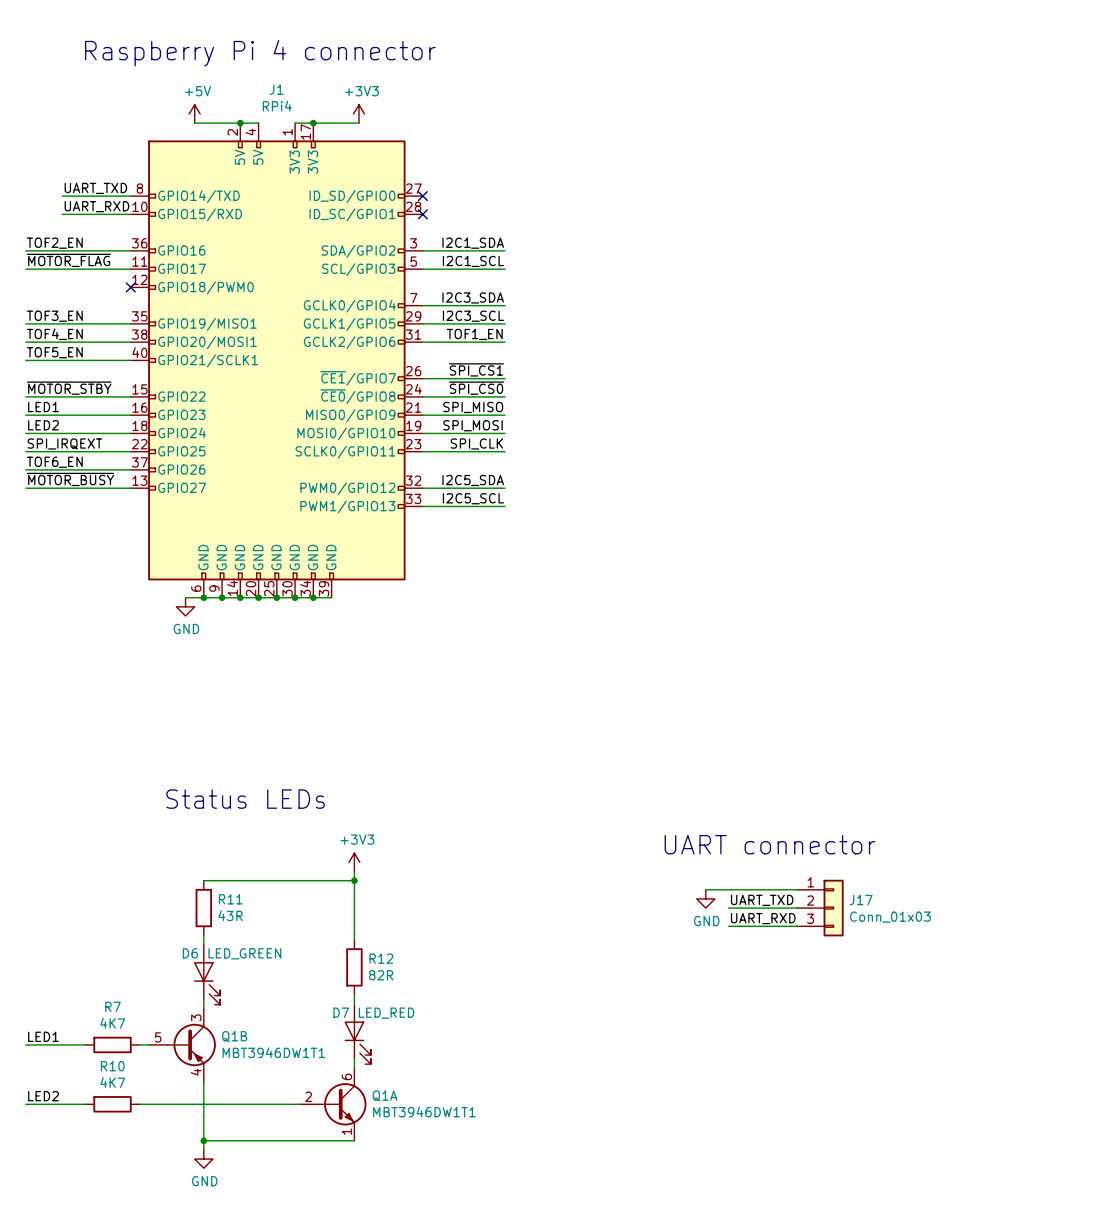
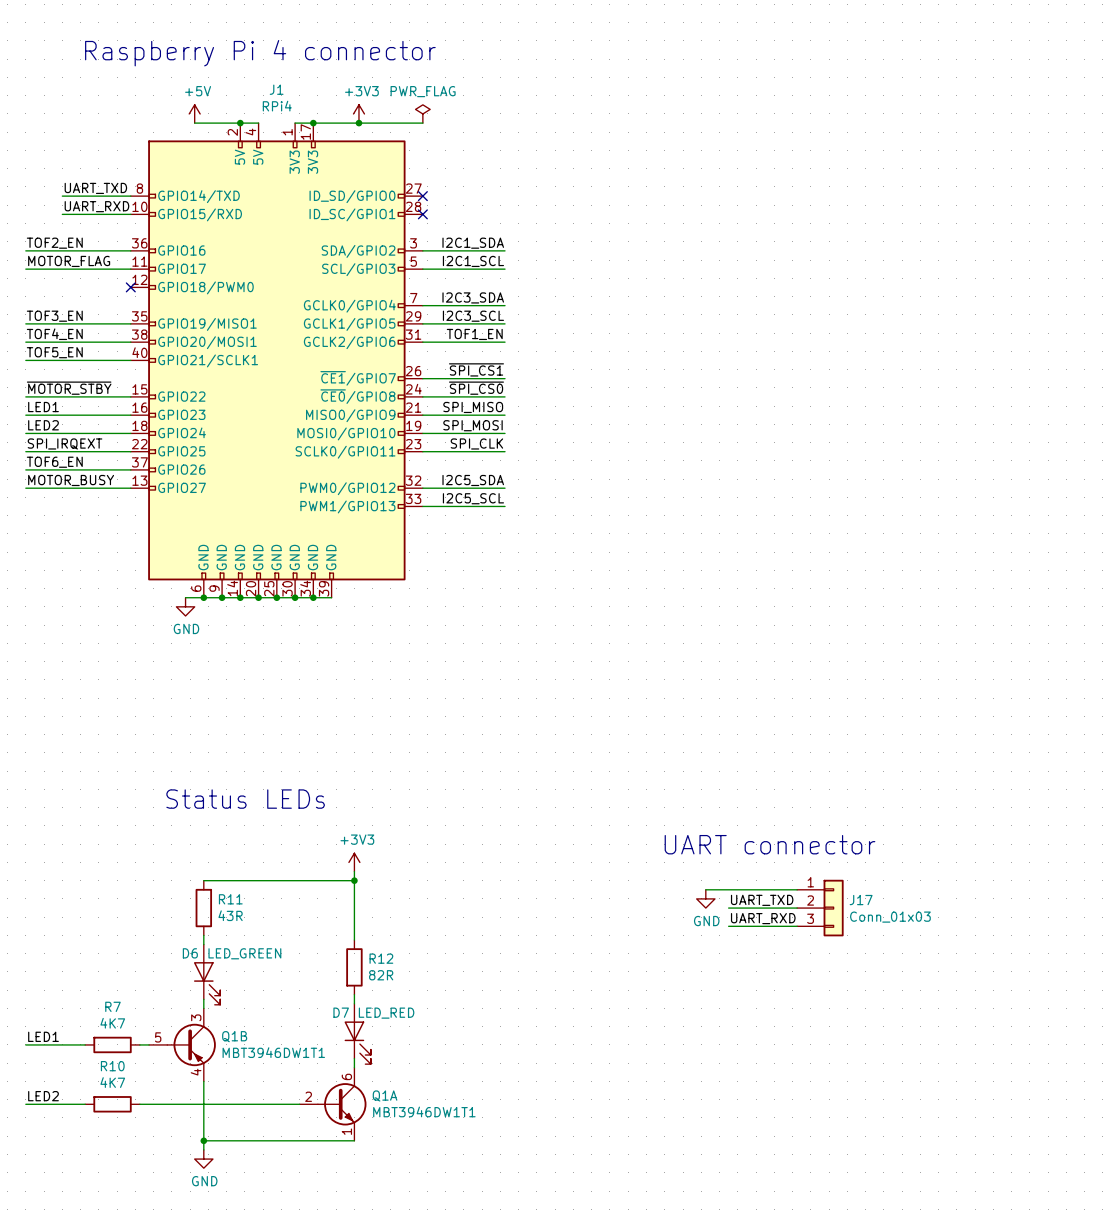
power symbol: none -> PWR_FLAG (422, 113)
wire: none -> (358, 123) (422, 123)
junction: none -> (358, 123)
label: ~{MOTOR_FLAG} (68, 260) -> MOTOR_FLAG (69, 261)
label: ~{MOTOR_BUSY} (70, 479) -> MOTOR_BUSY (71, 480)

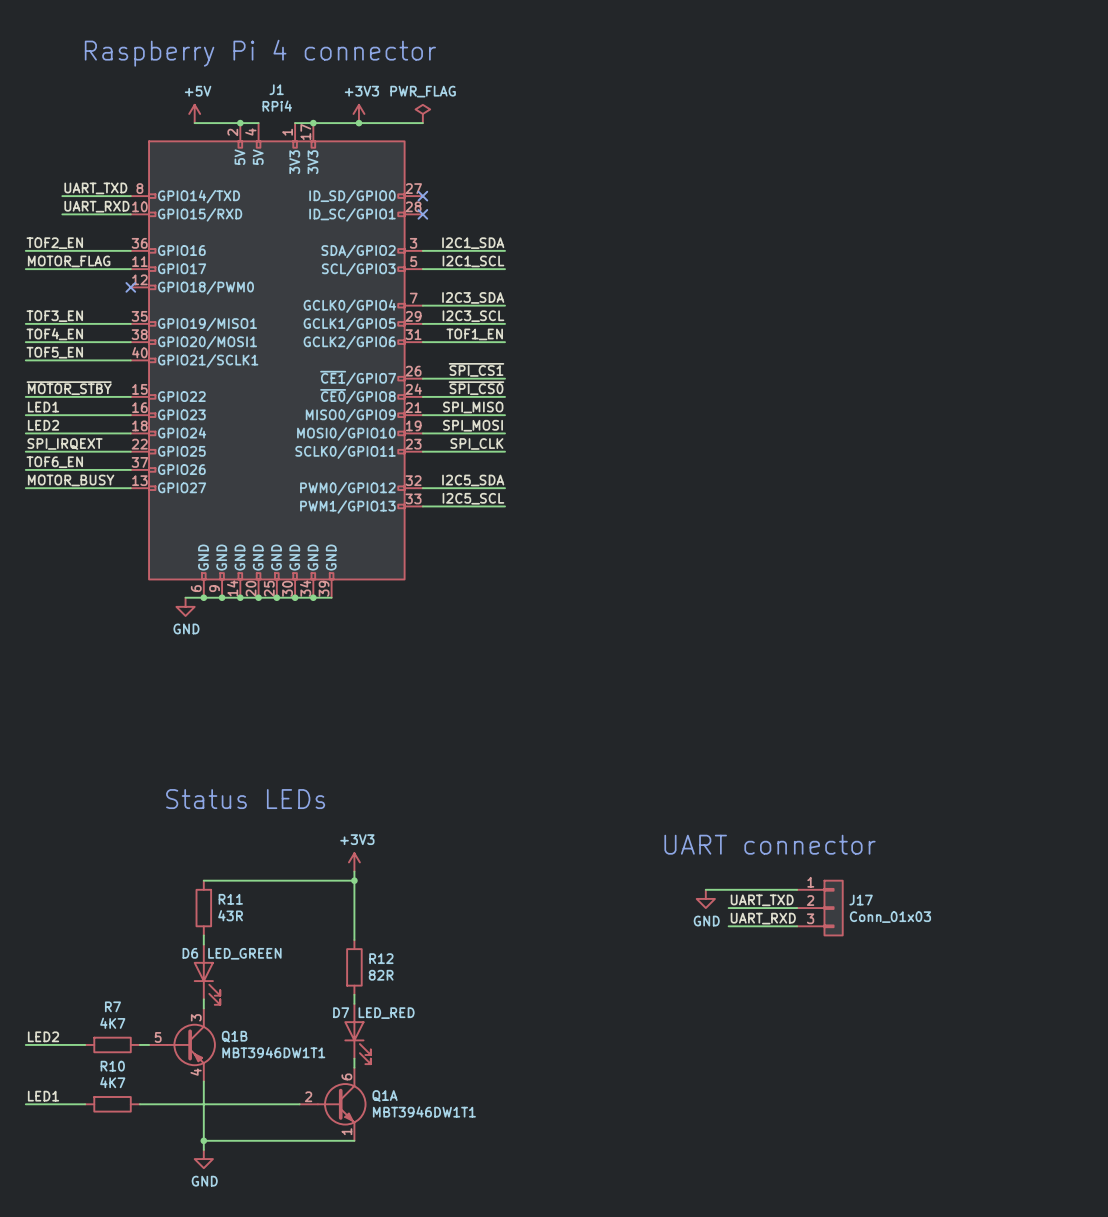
label: LED1 (43, 1036) -> LED2 (43, 1036)
label: LED2 (43, 1096) -> LED1 (43, 1096)

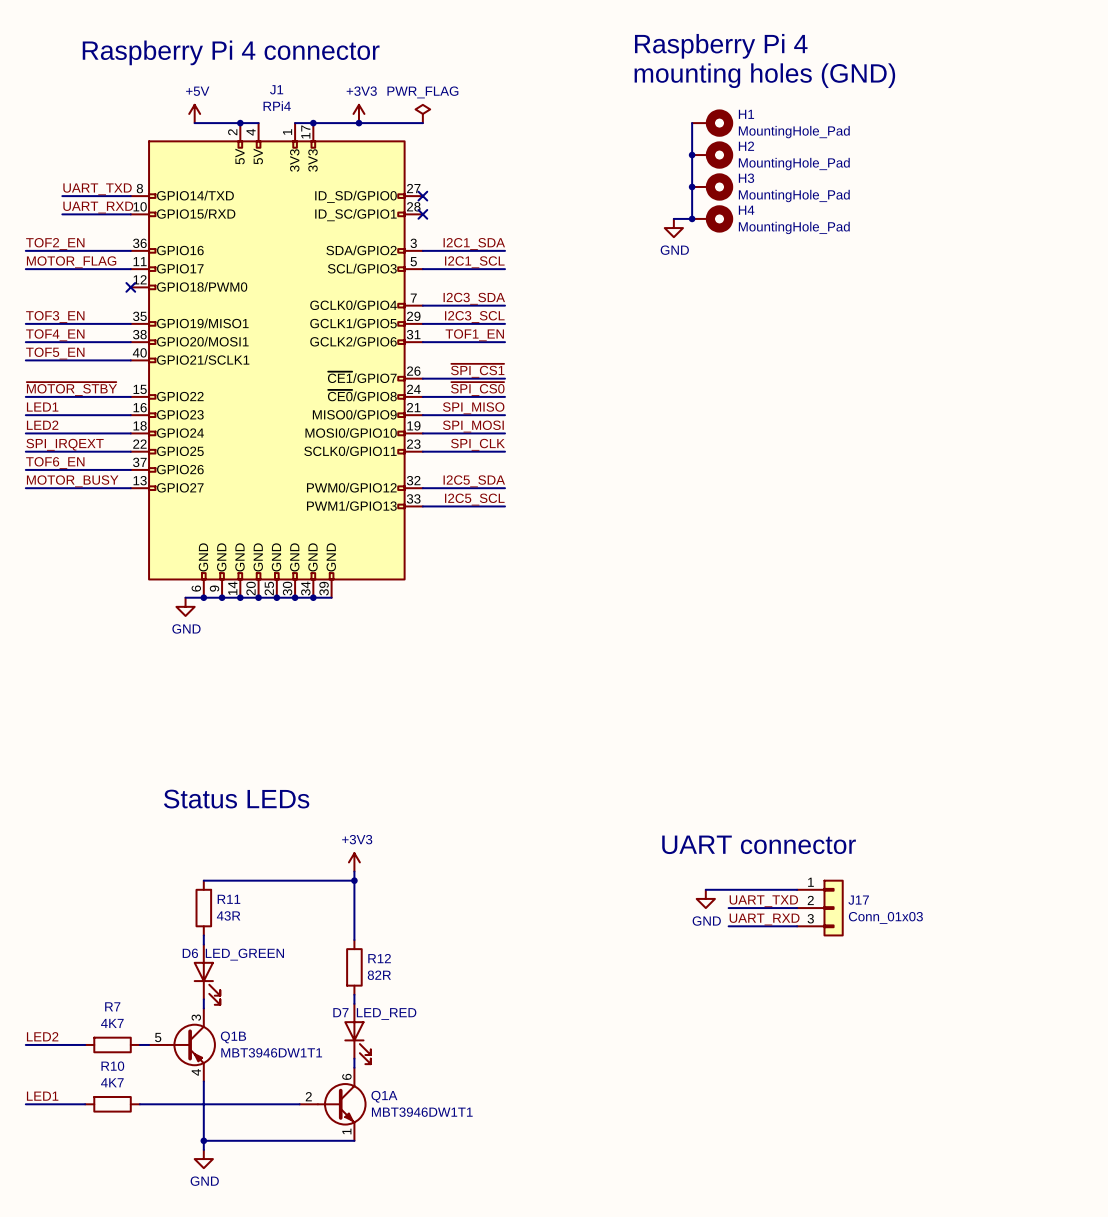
text: none -> Raspberry Pi 4 (721, 46)
text: none -> mounting holes (GND) (764, 75)
wire: none -> (692, 123) (692, 218) (673, 218)
H1: none -> MountingHole_Pad (712, 123)
junction: none -> (692, 155)
H2: none -> MountingHole_Pad (712, 155)
junction: none -> (692, 186)
H3: none -> MountingHole_Pad (712, 186)
junction: none -> (692, 218)
H4: none -> MountingHole_Pad (712, 218)
power symbol: none -> GND (673, 228)

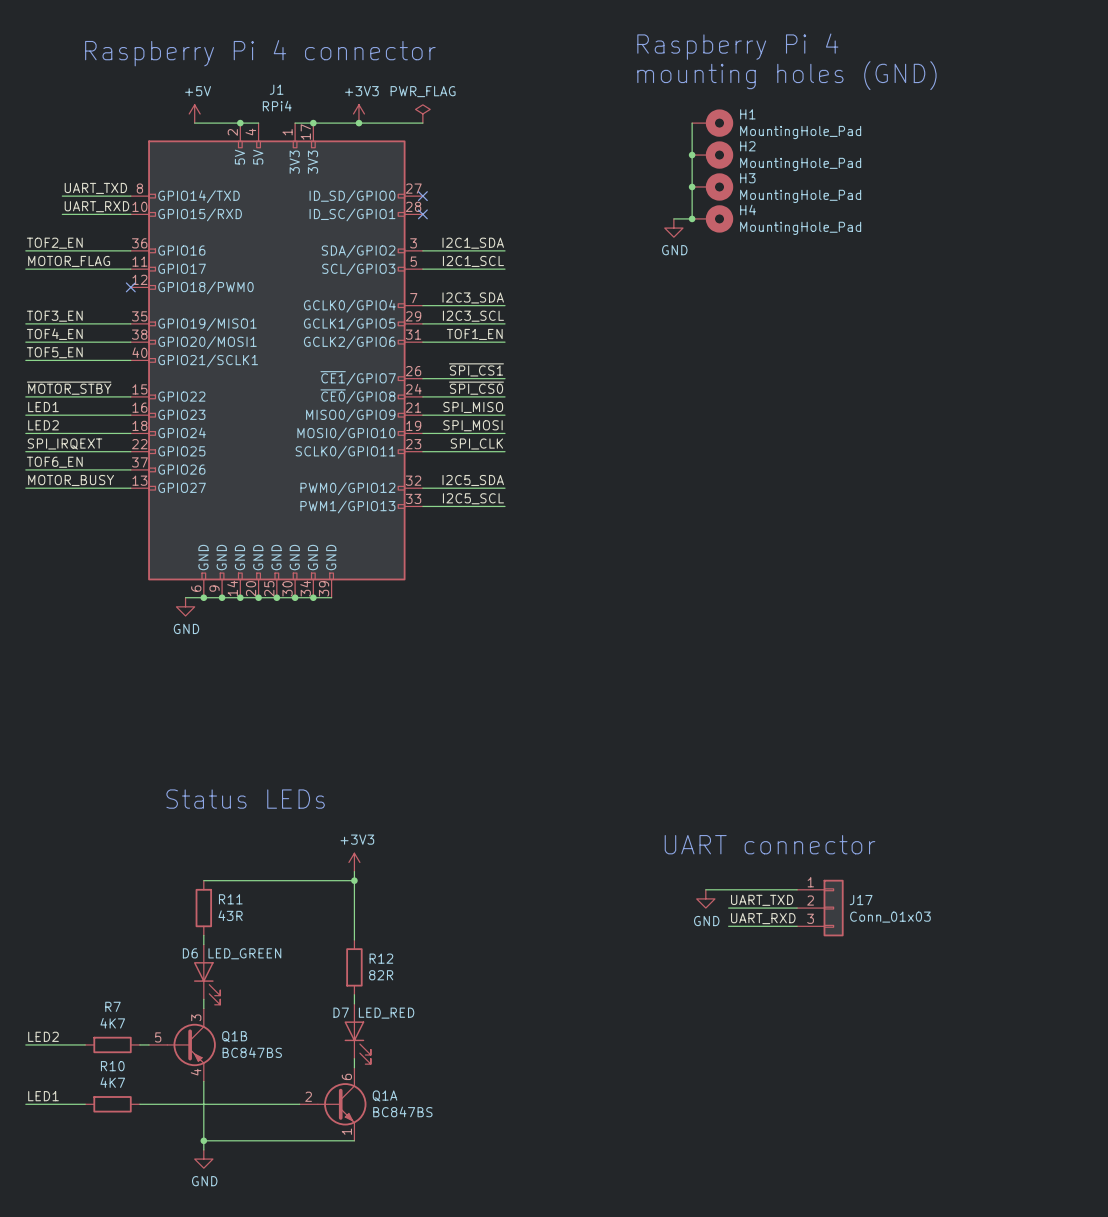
Q1B value: MBT3946DW1T1 (271, 1052) -> BC847BS (252, 1052)
Q1A value: MBT3946DW1T1 (422, 1112) -> BC847BS (402, 1111)

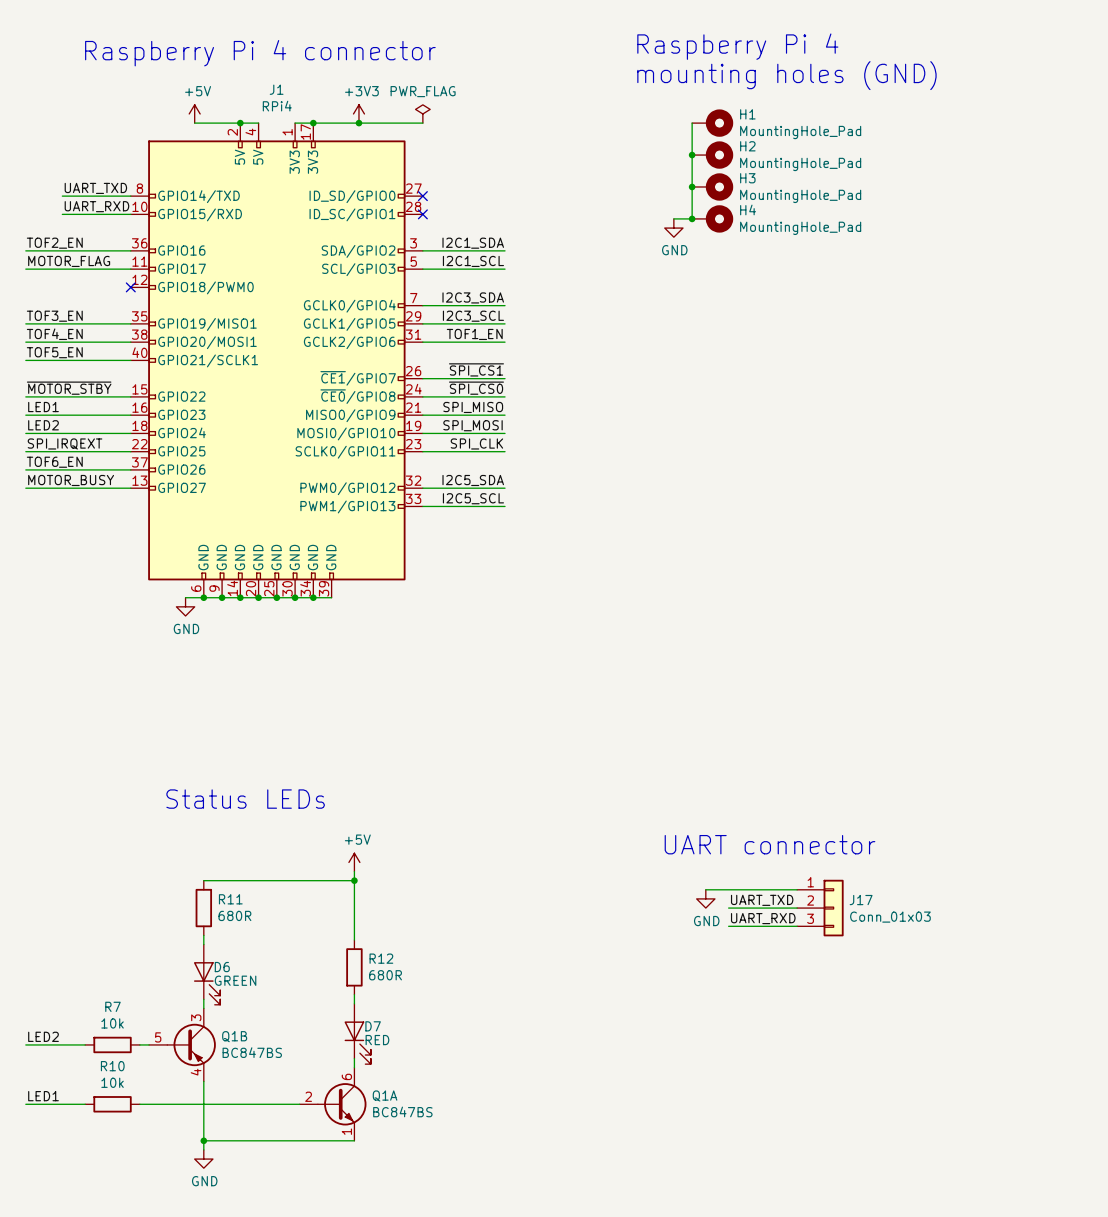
power symbol: +3V3 (354, 862) -> +5V (354, 862)
R11 value: 43R (230, 915) -> 680R (234, 915)
D6 name position: D6 (190, 953) -> D6 (222, 967)
D6 value: LED_GREEN (244, 953) -> GREEN (235, 980)
R12 value: 82R (381, 975) -> 680R (385, 975)
D7 name position: D7 (341, 1012) -> D7 (373, 1026)
D7 value: LED_RED (386, 1013) -> RED (377, 1040)
R7 value: 4K7 (112, 1023) -> 10k (112, 1023)
R10 value: 4K7 (112, 1082) -> 10k (112, 1082)

